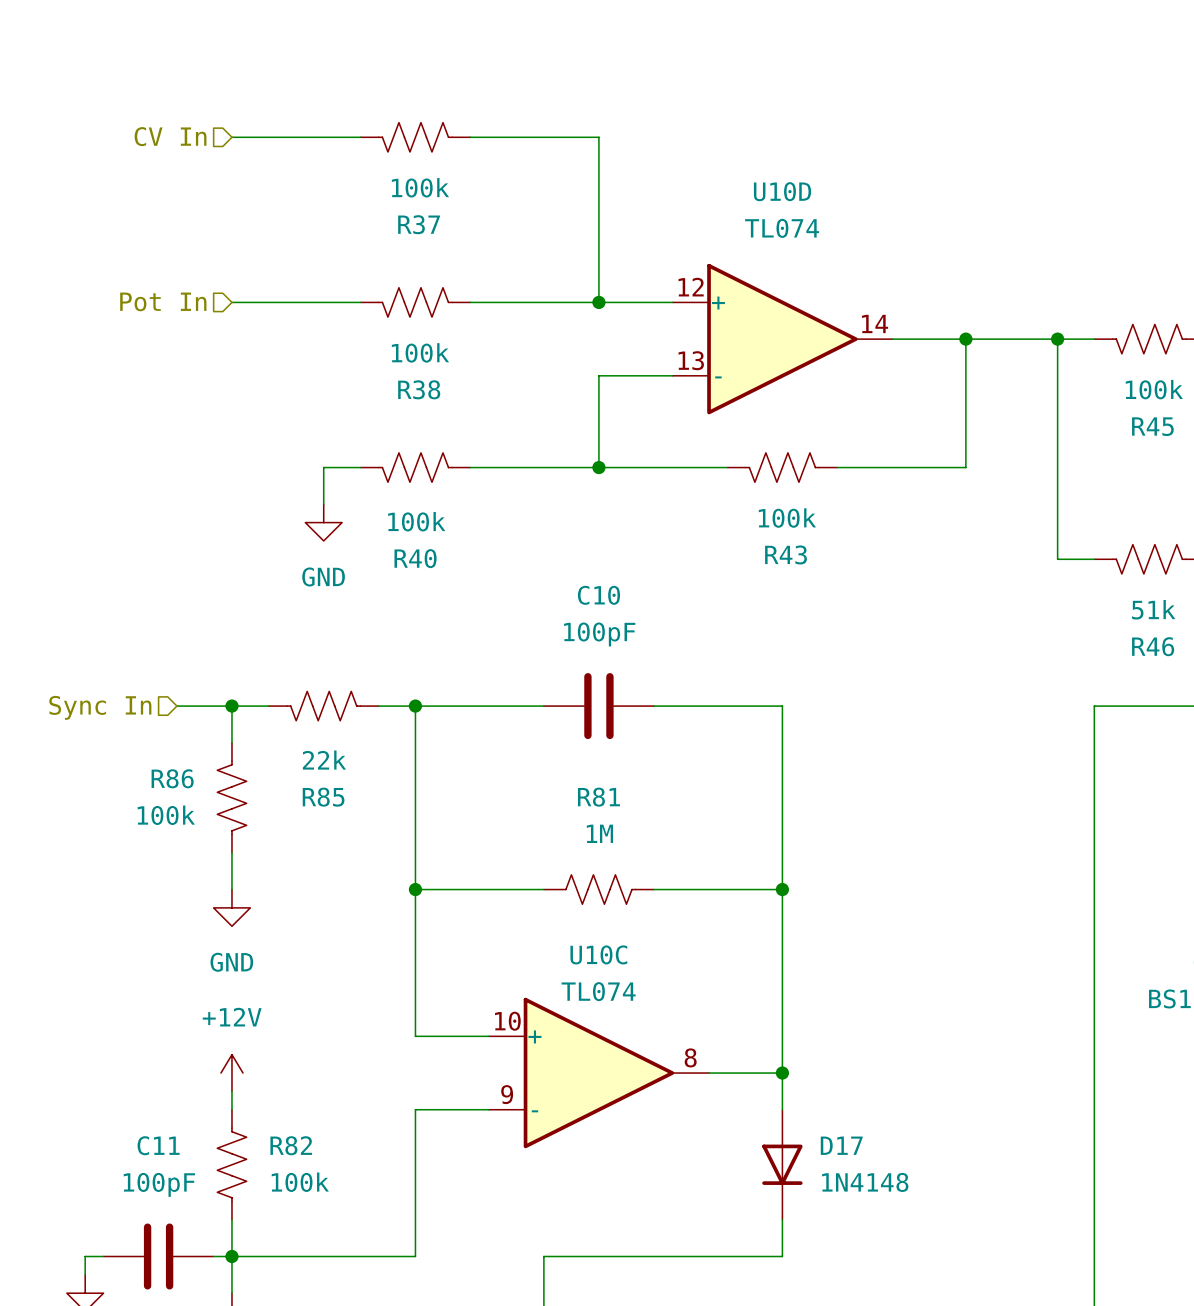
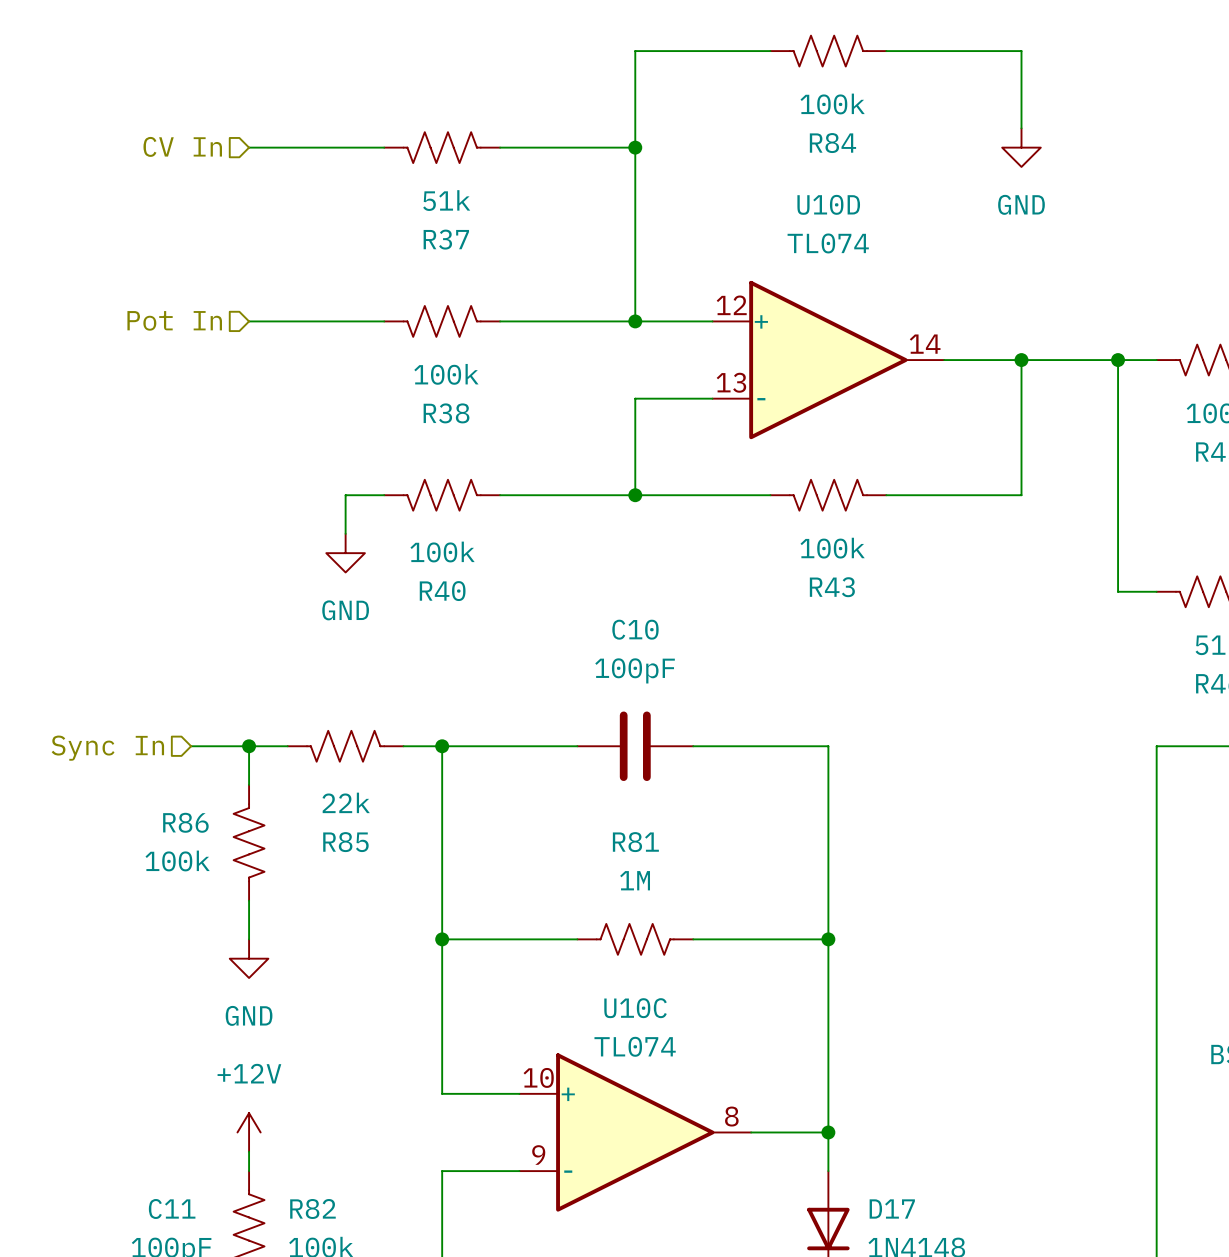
wire: none -> (770, 51) (635, 51) (635, 147)
R84: none -> 100k (828, 51)
wire: none -> (886, 51) (1021, 51) (1021, 128)
junction: none -> (635, 147)
power symbol: none -> GND (1021, 147)
R37 value: 100k (420, 187) -> 51k (446, 200)

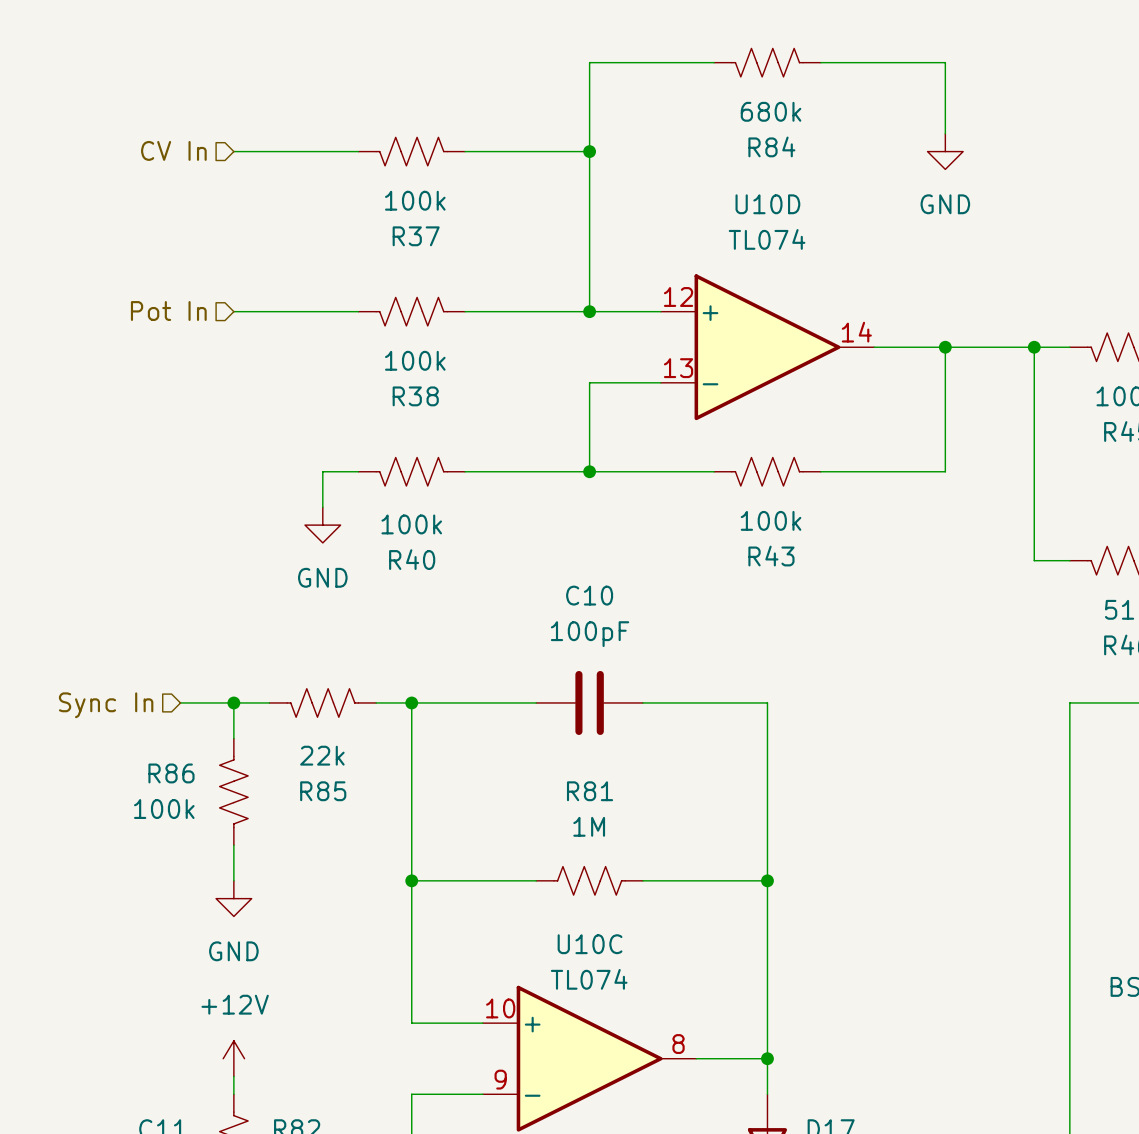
R84 value: 100k (832, 104) -> 680k (771, 111)
R37 value: 51k (446, 200) -> 100k (415, 200)

